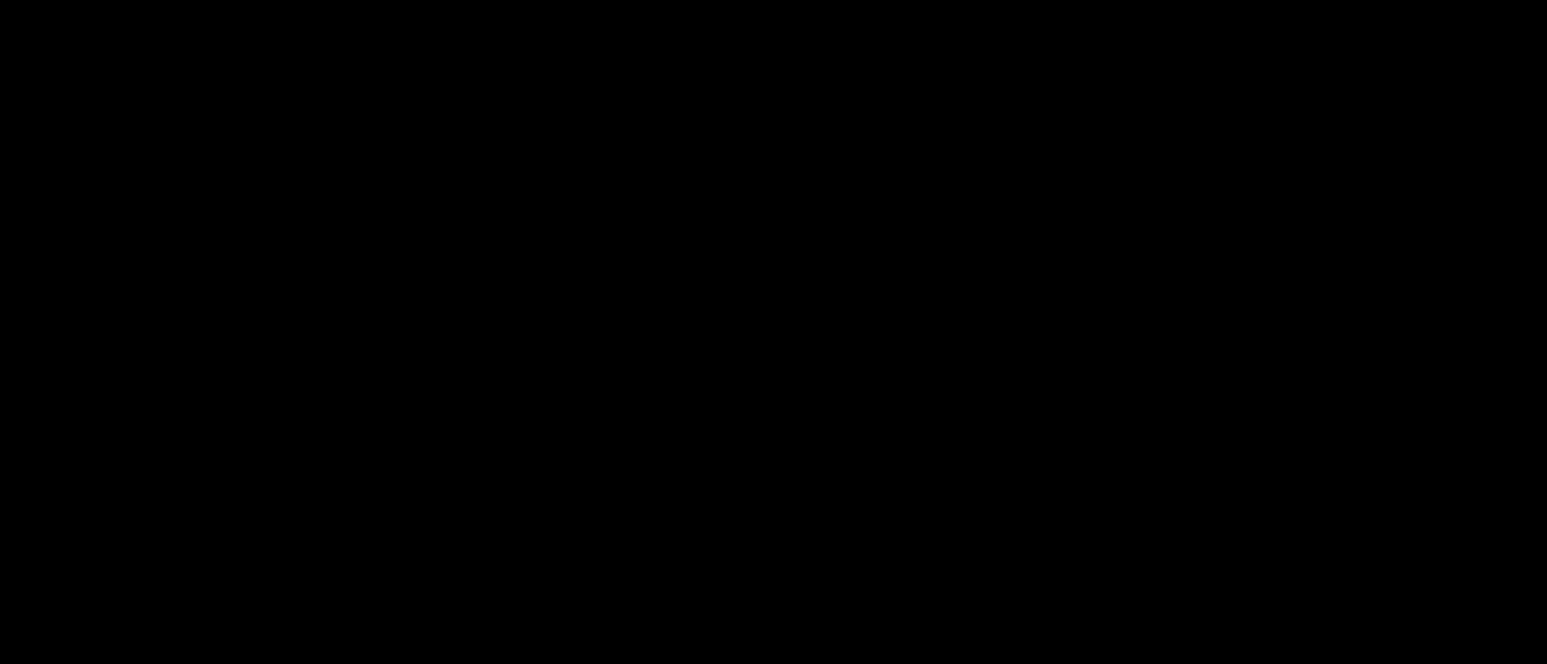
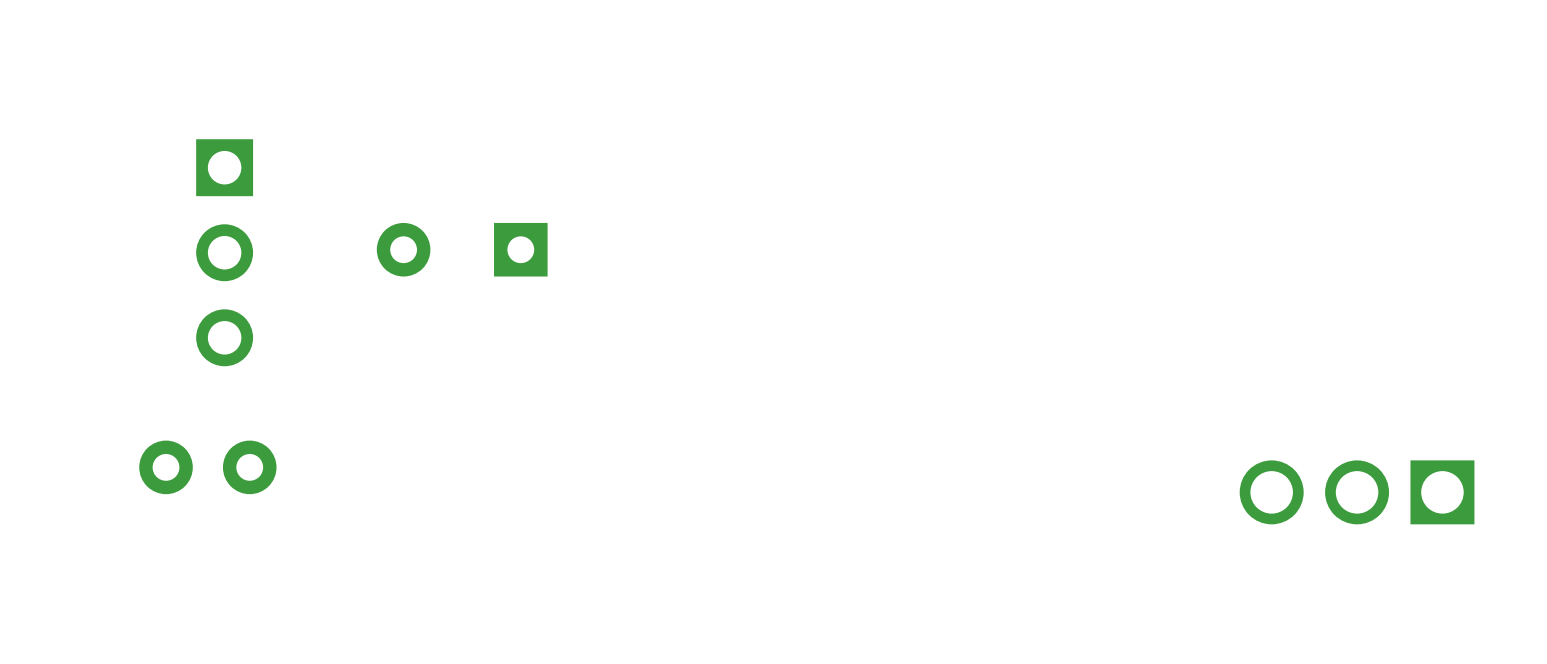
part: none -> (462, 249)
part: none -> (224, 252)
part: none -> (207, 467)
part: none -> (1357, 492)

